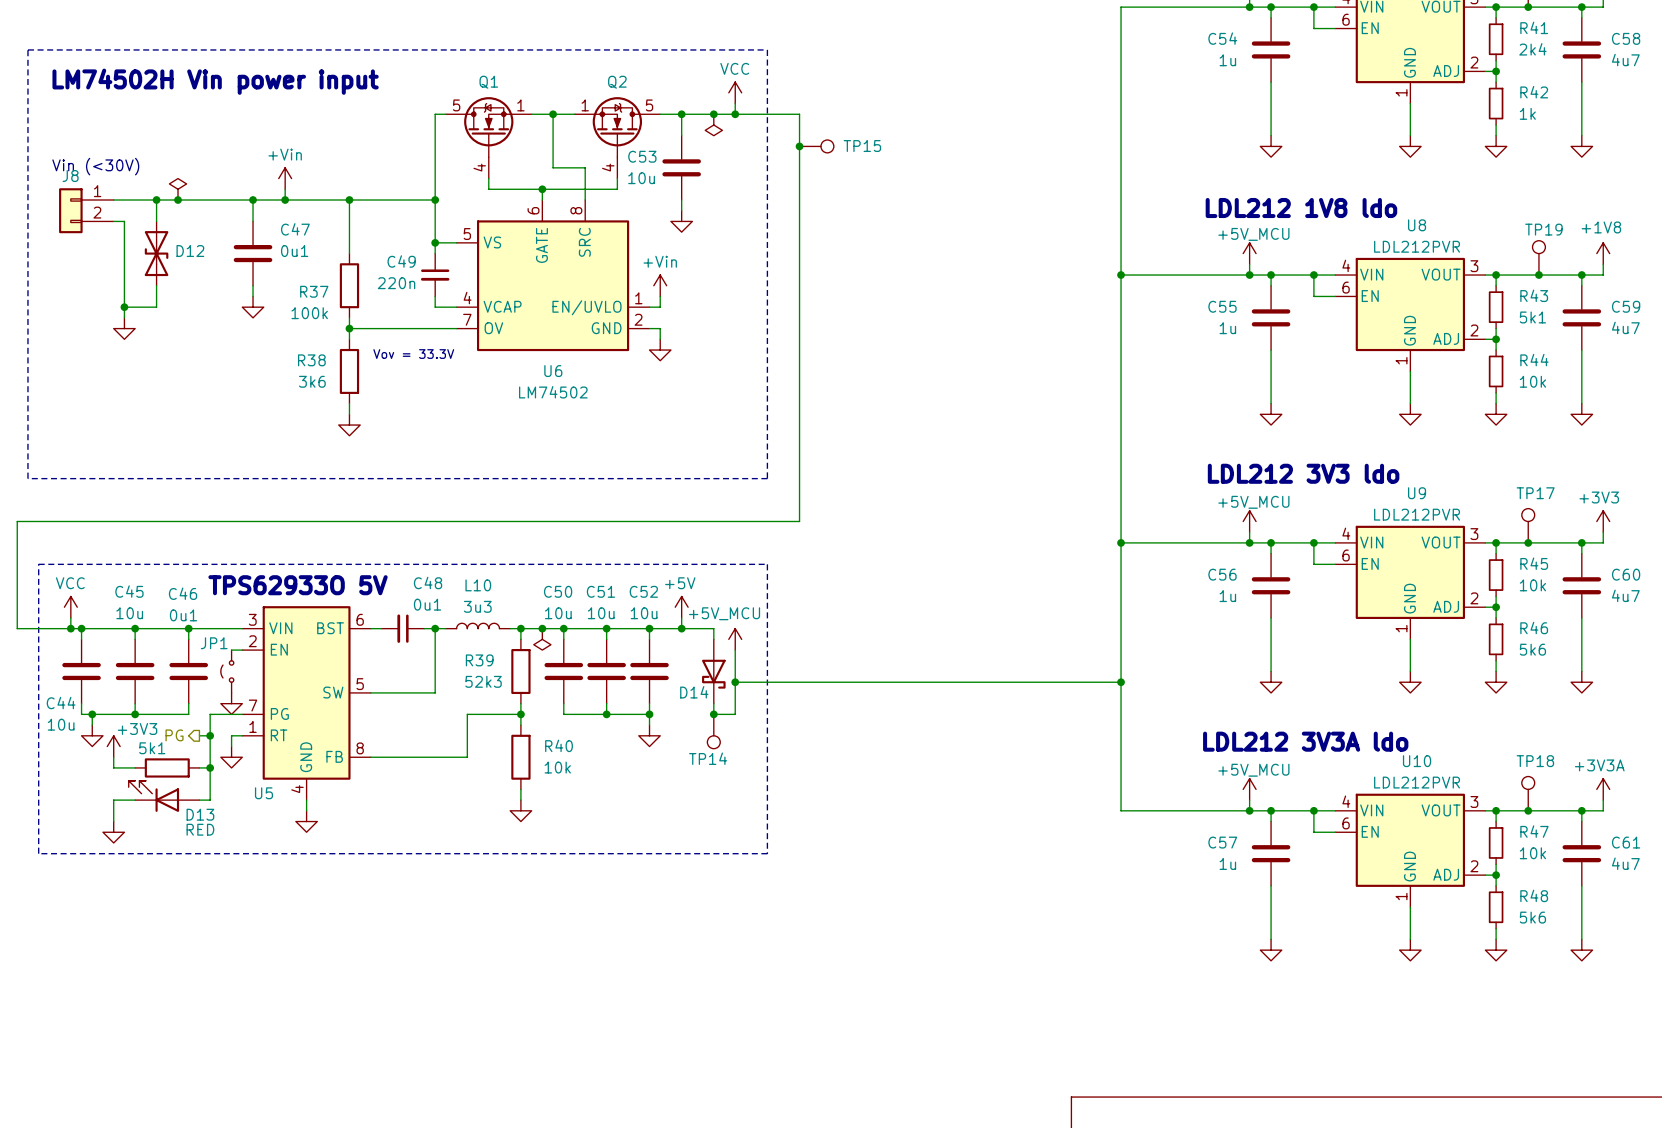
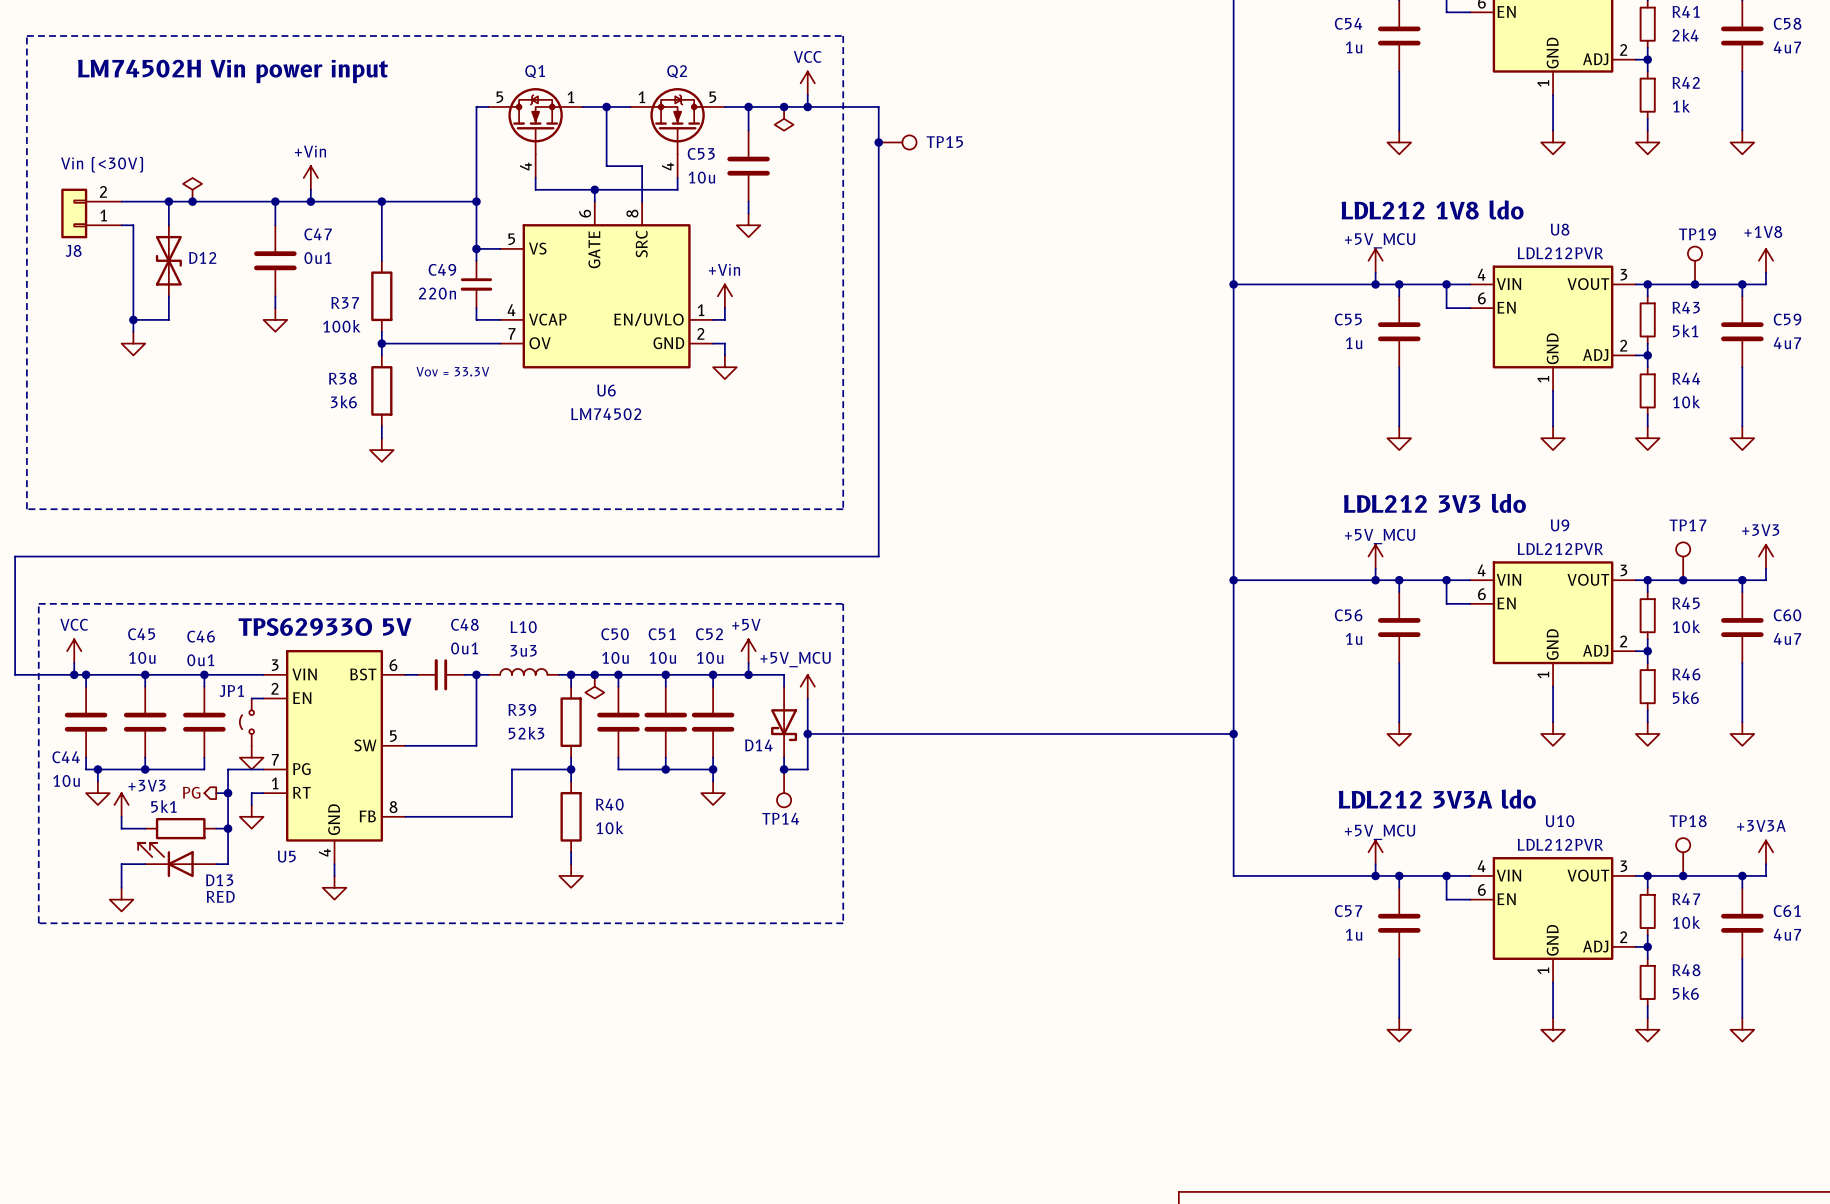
J8 flip: as is (70, 210) -> up-down (74, 213)

